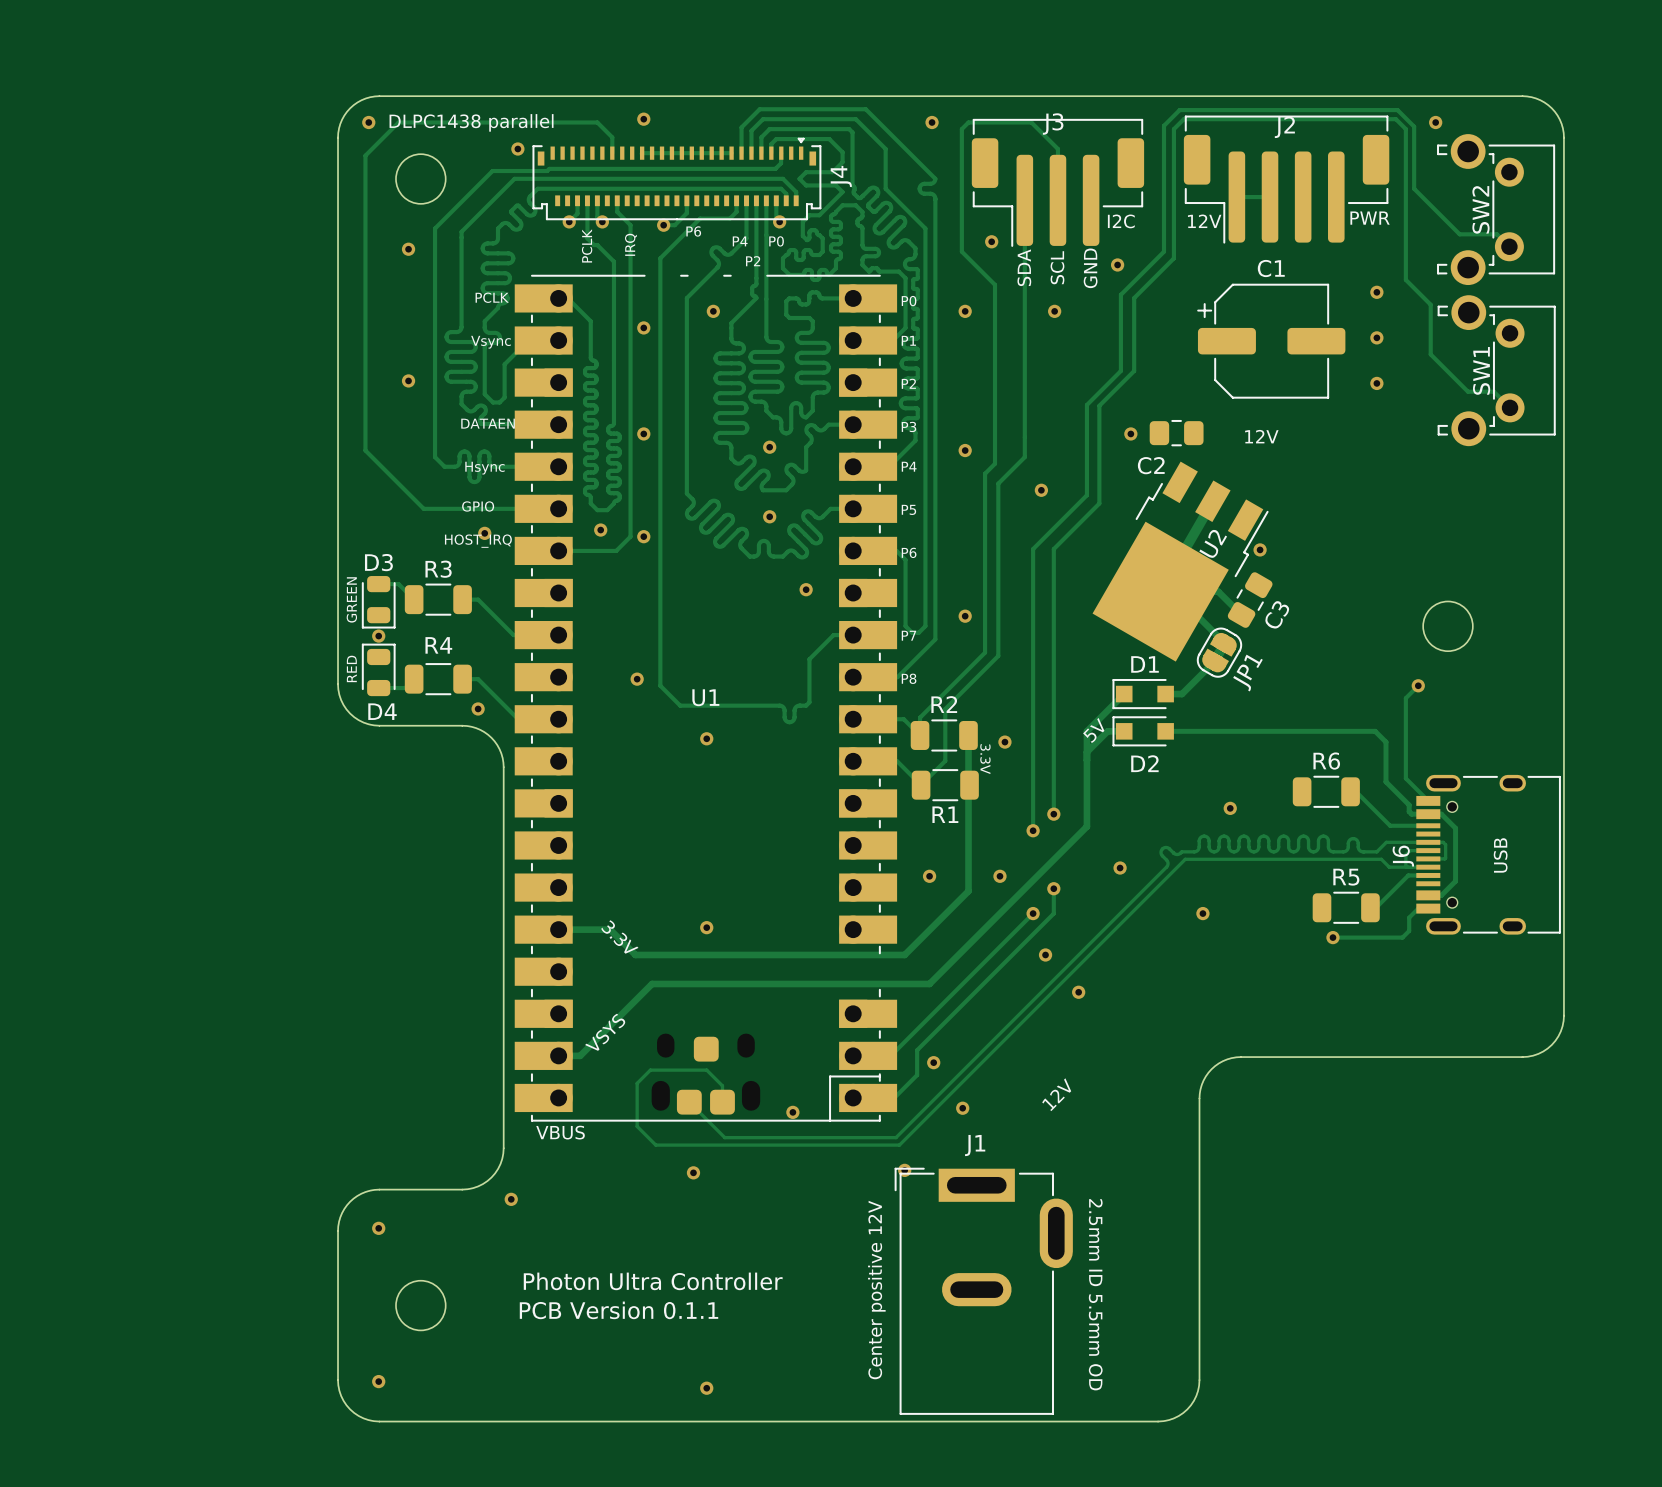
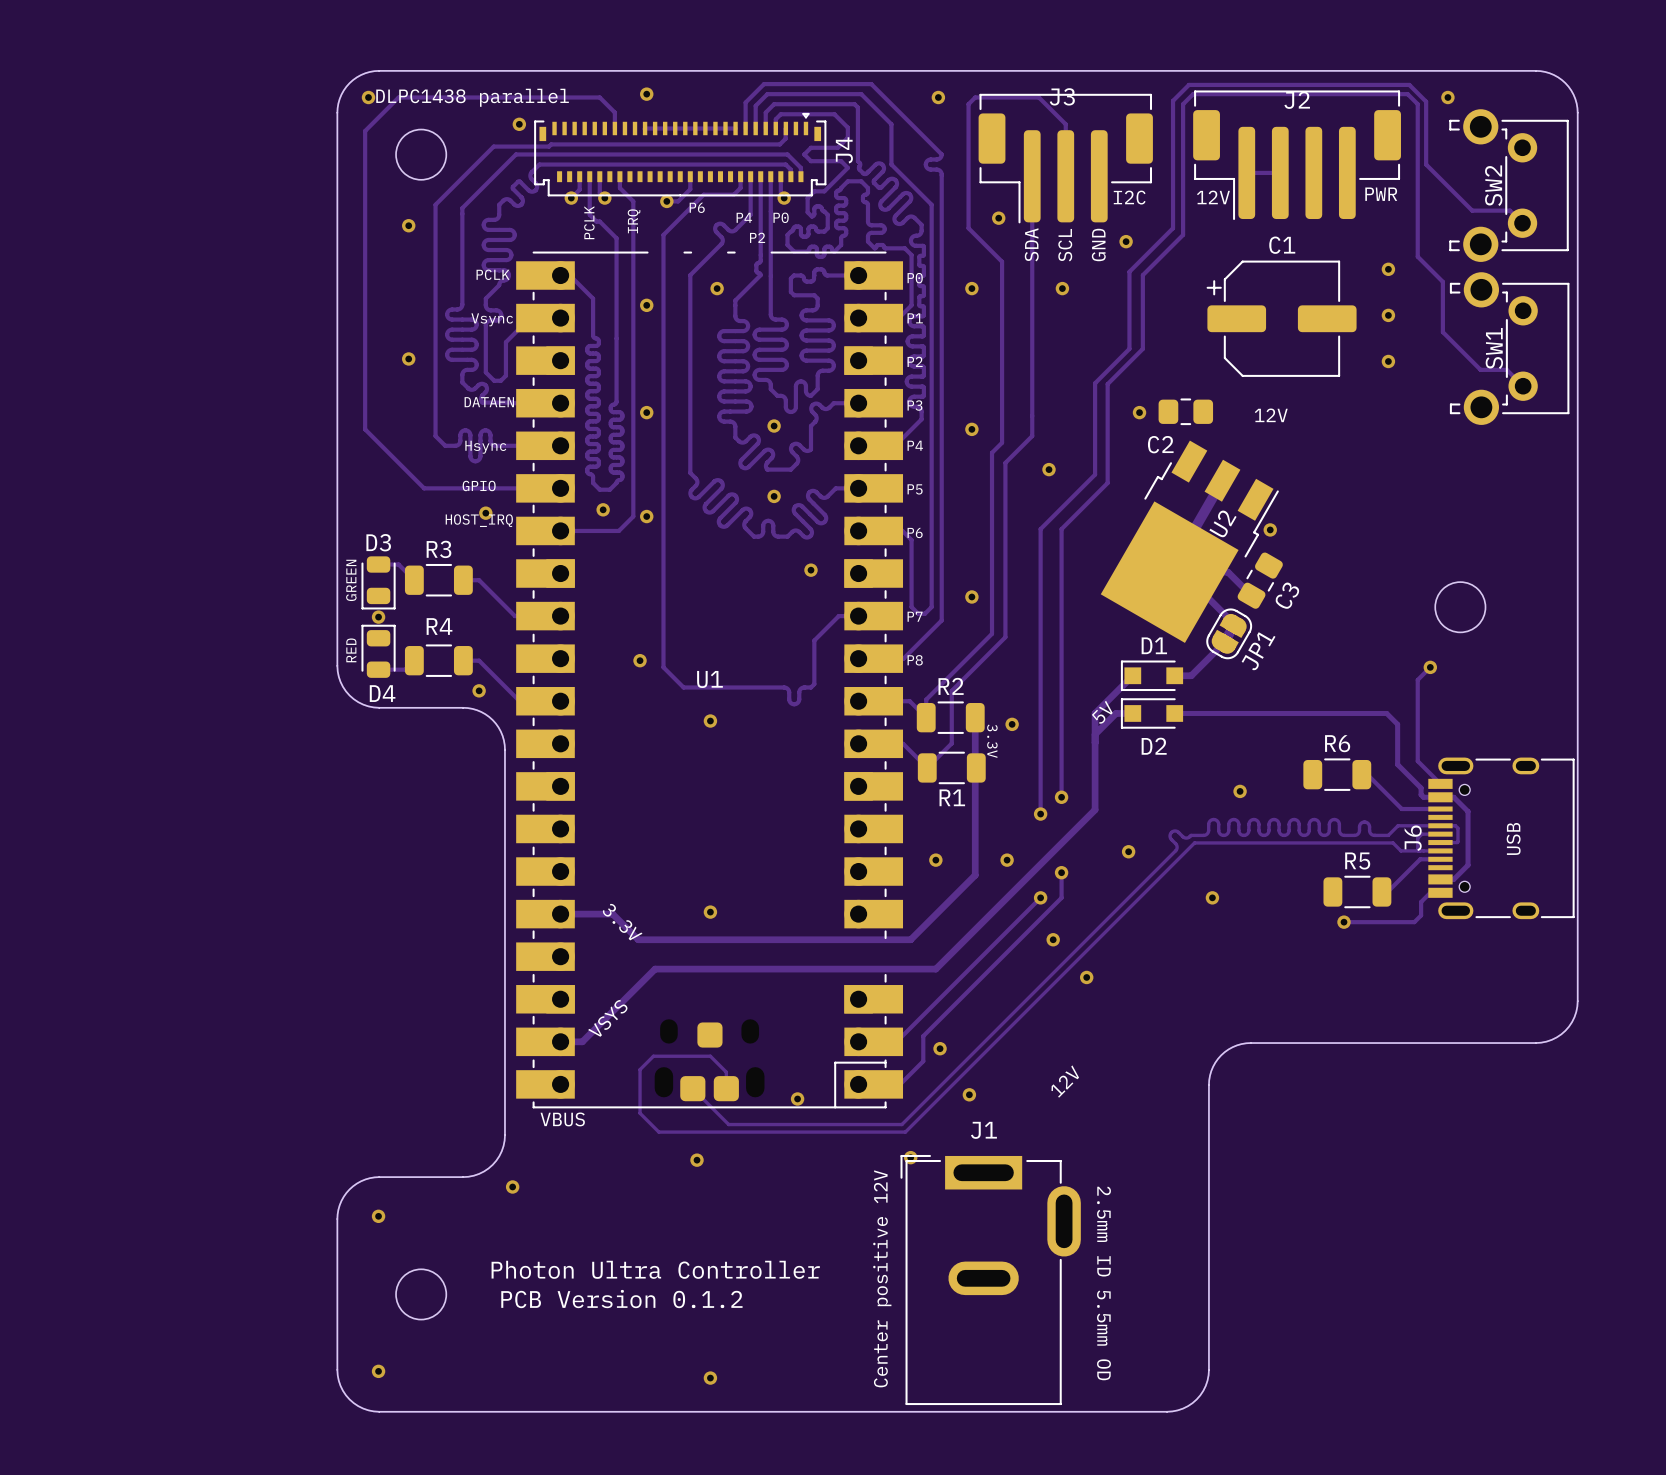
text: PCB Version 0.1.1 (619, 1310) -> PCB Version 0.1.2 (621, 1299)

